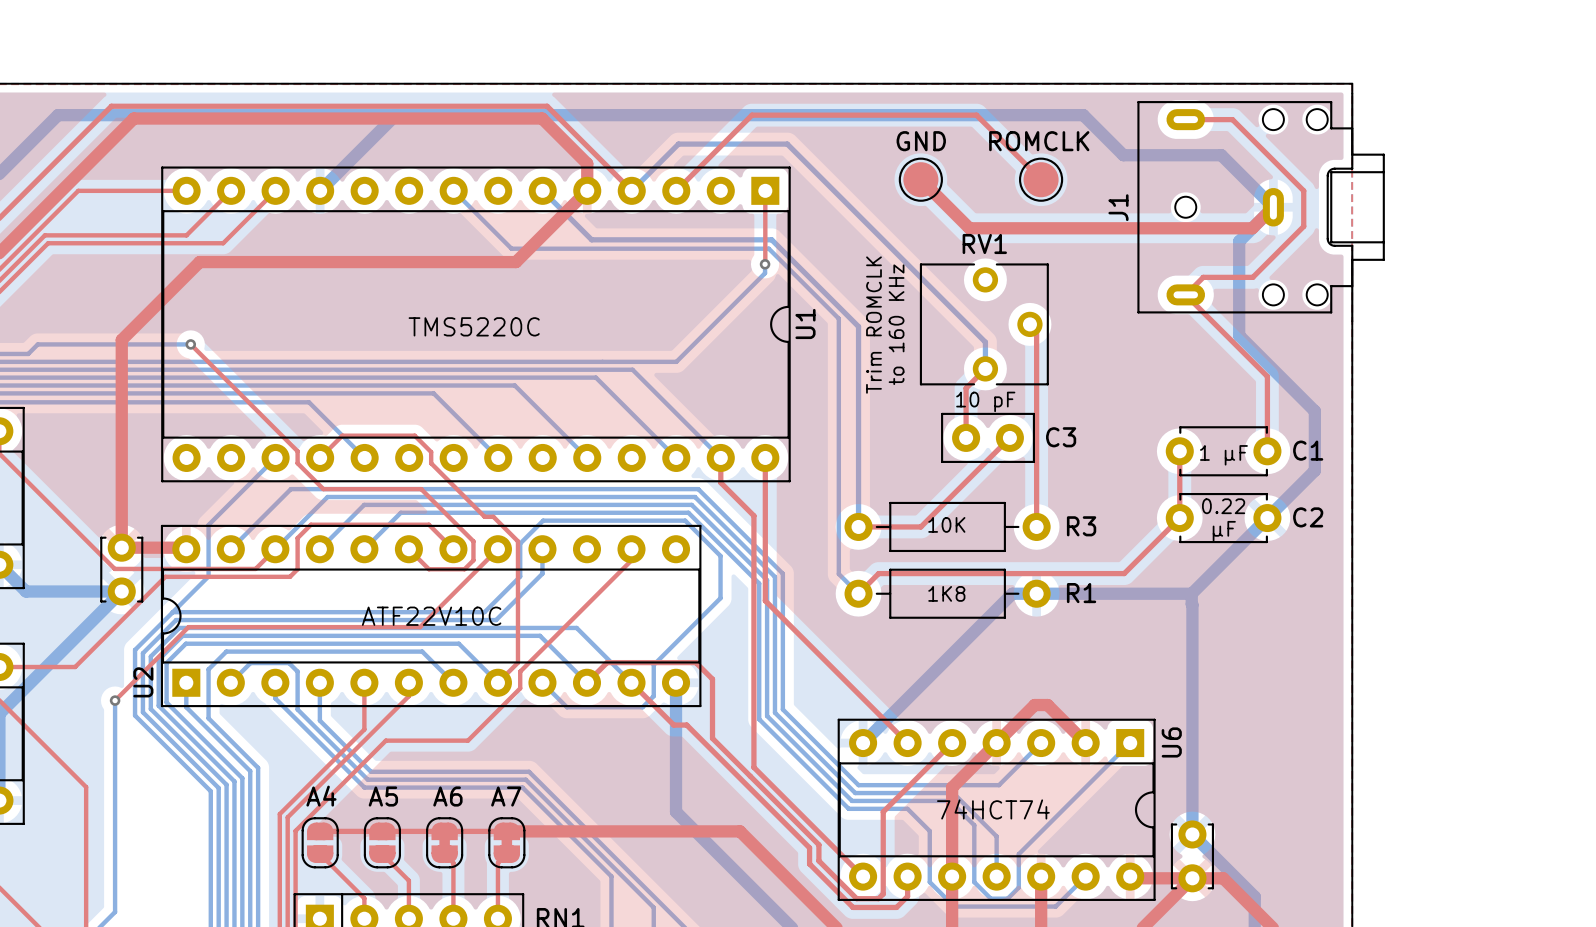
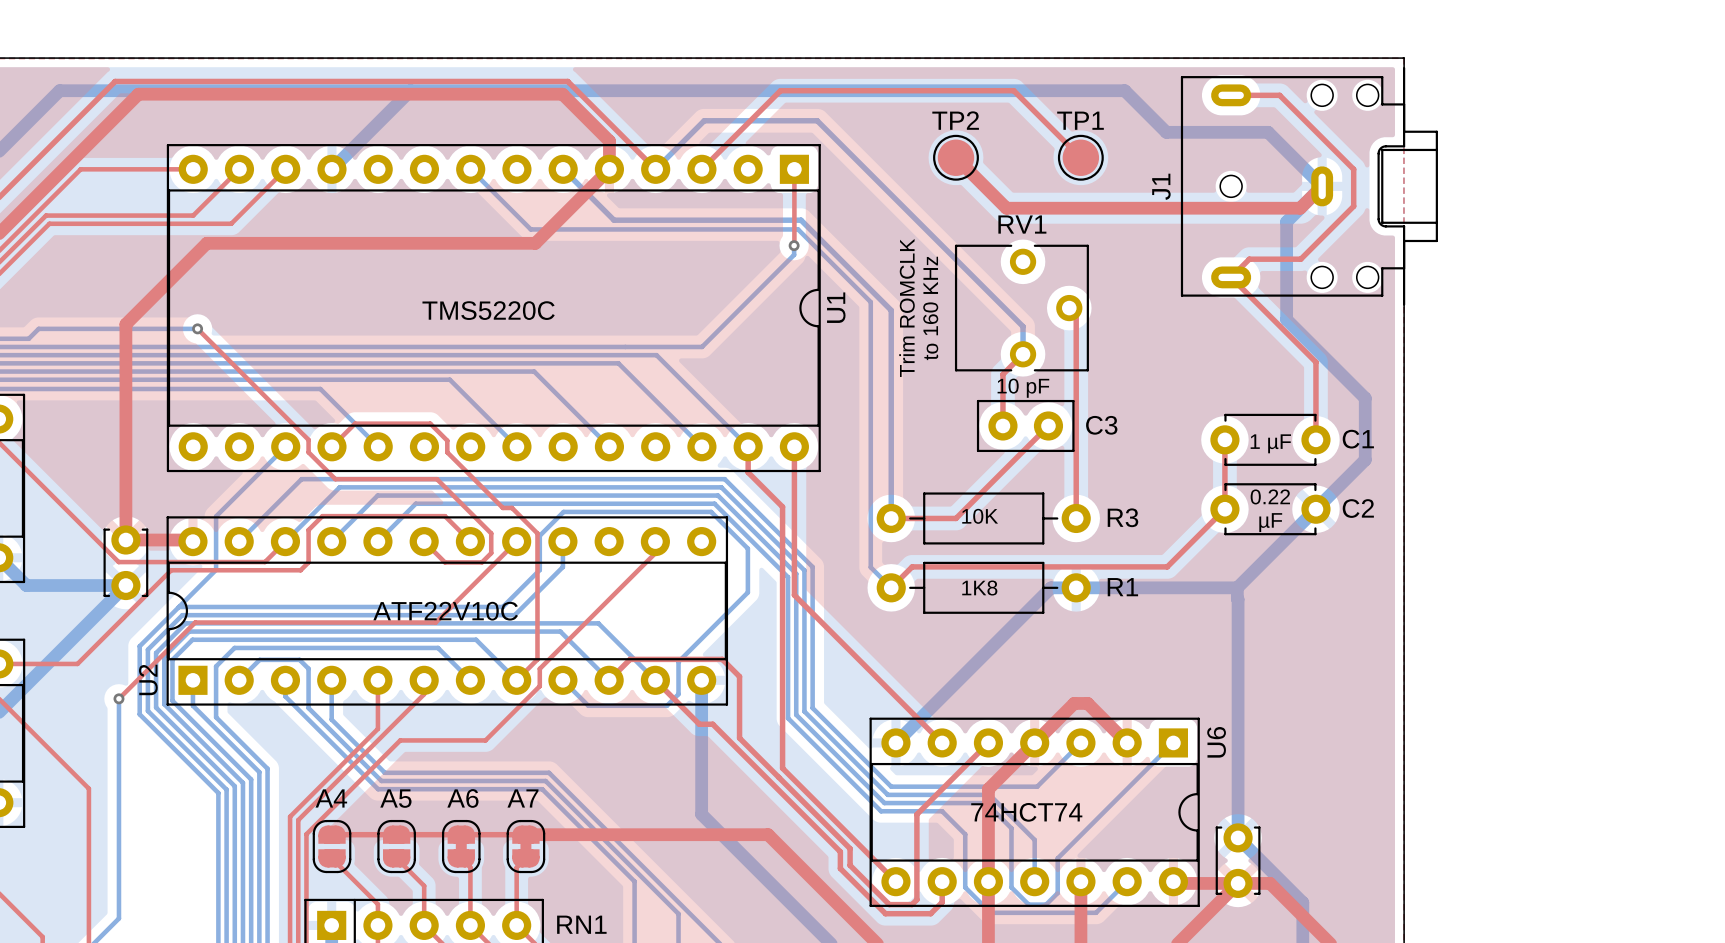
text: GND (921, 141) -> none
text: ROMCLK (1039, 141) -> none
TP2 name: none -> TP2 (955, 120)
TP1 name: none -> TP1 (1080, 120)

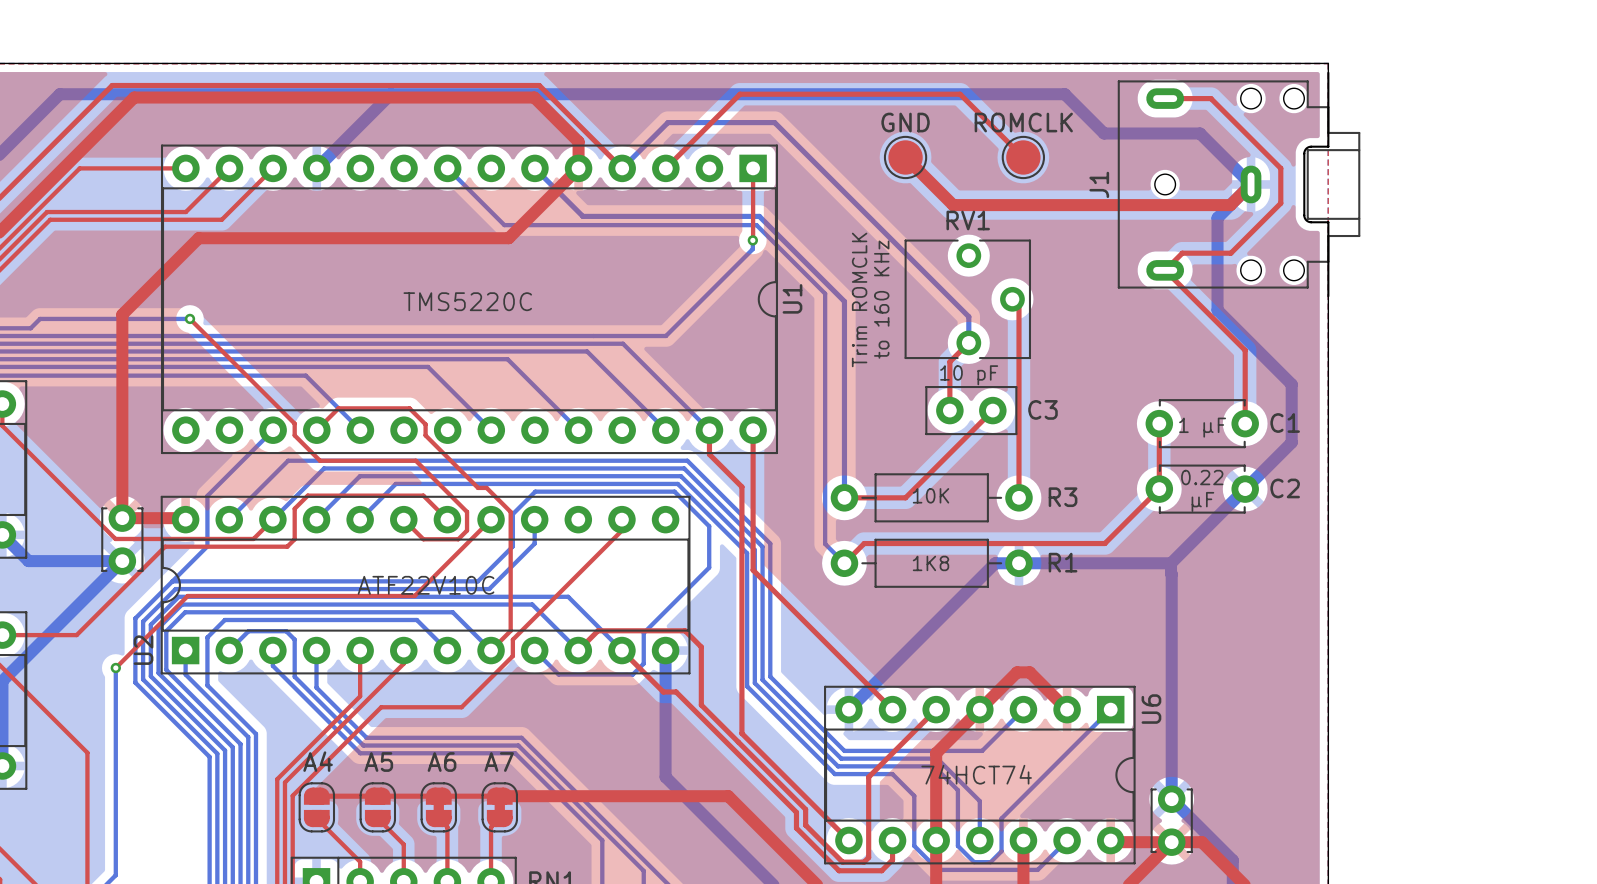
TP2 name: TP2 (955, 120) -> GND (905, 122)
TP1 name: TP1 (1080, 120) -> ROMCLK (1023, 122)

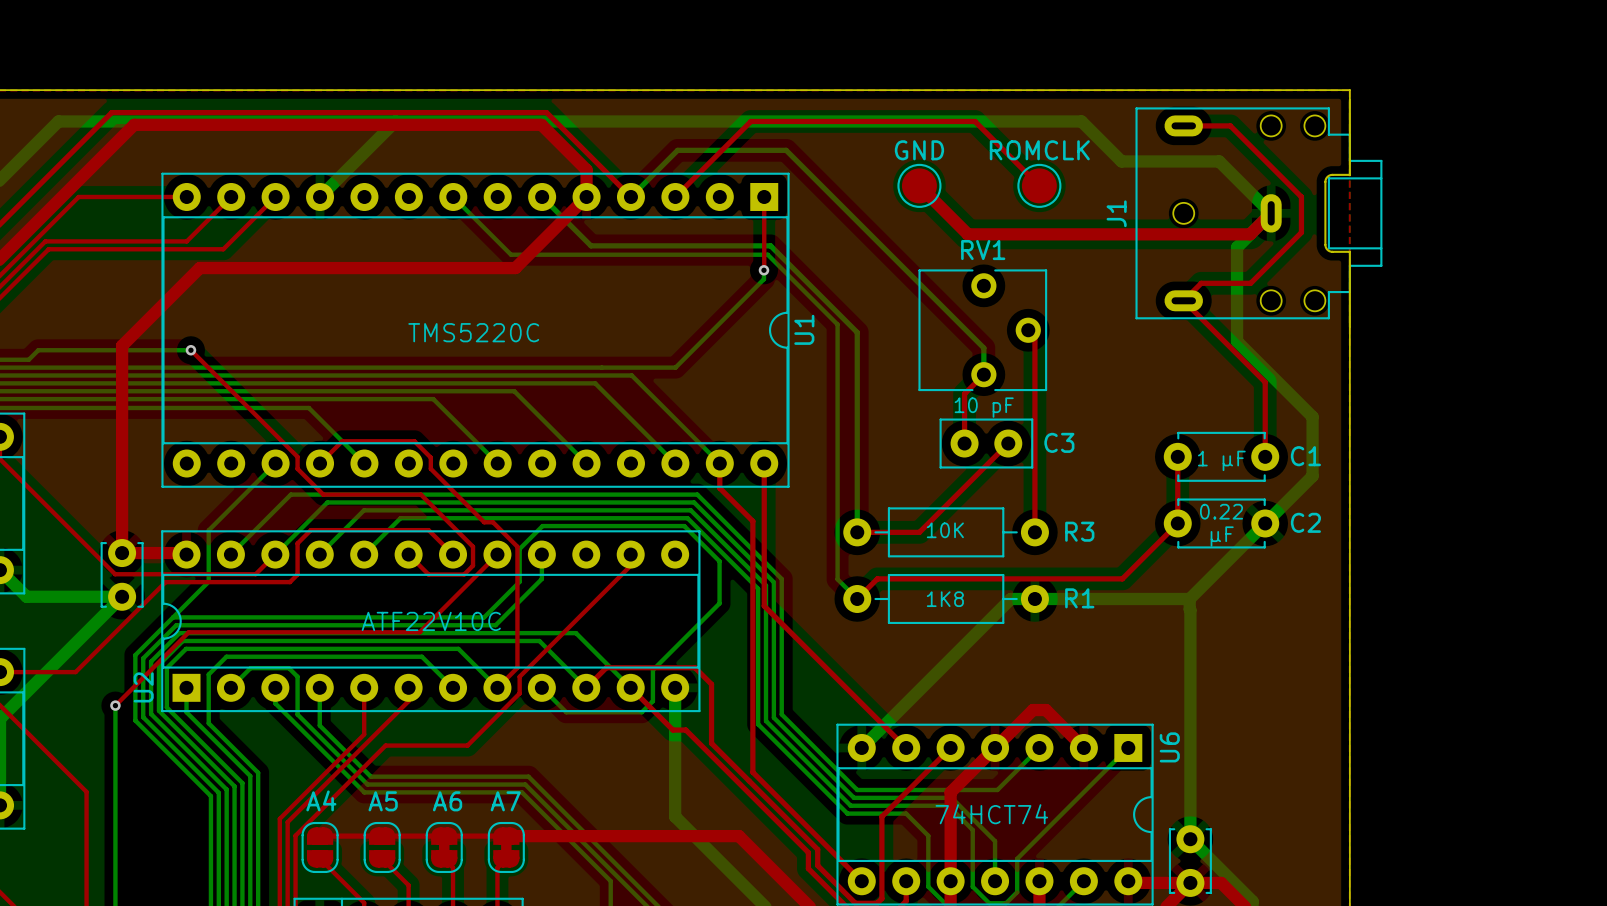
text: Trim ROMCLK (859, 299) -> none
text: to 160 KHz (881, 299) -> none

